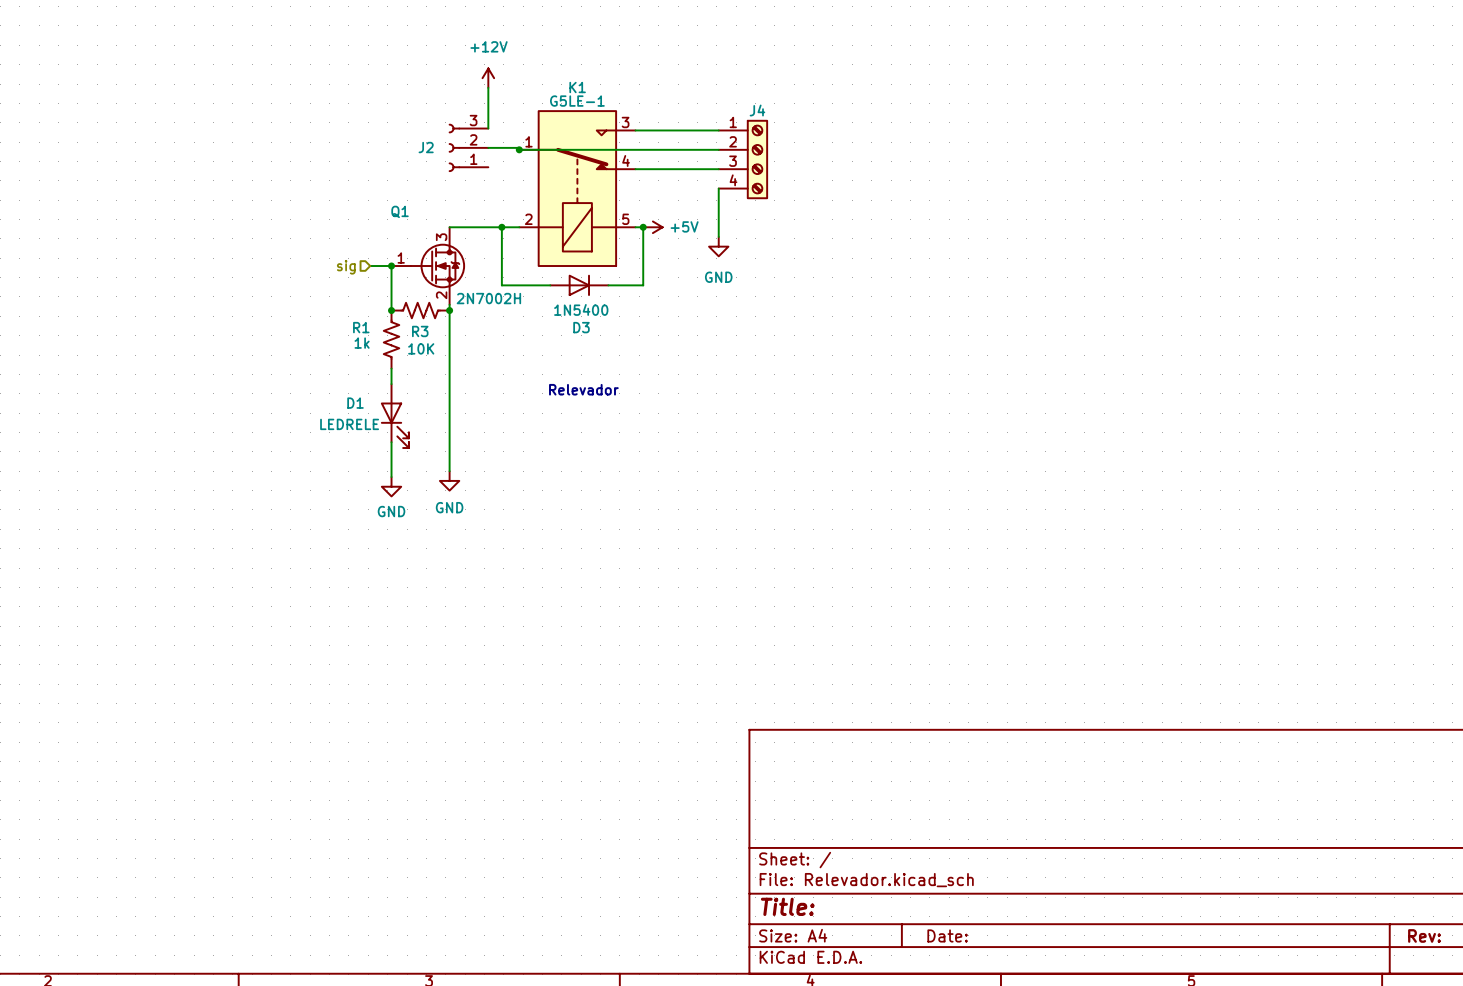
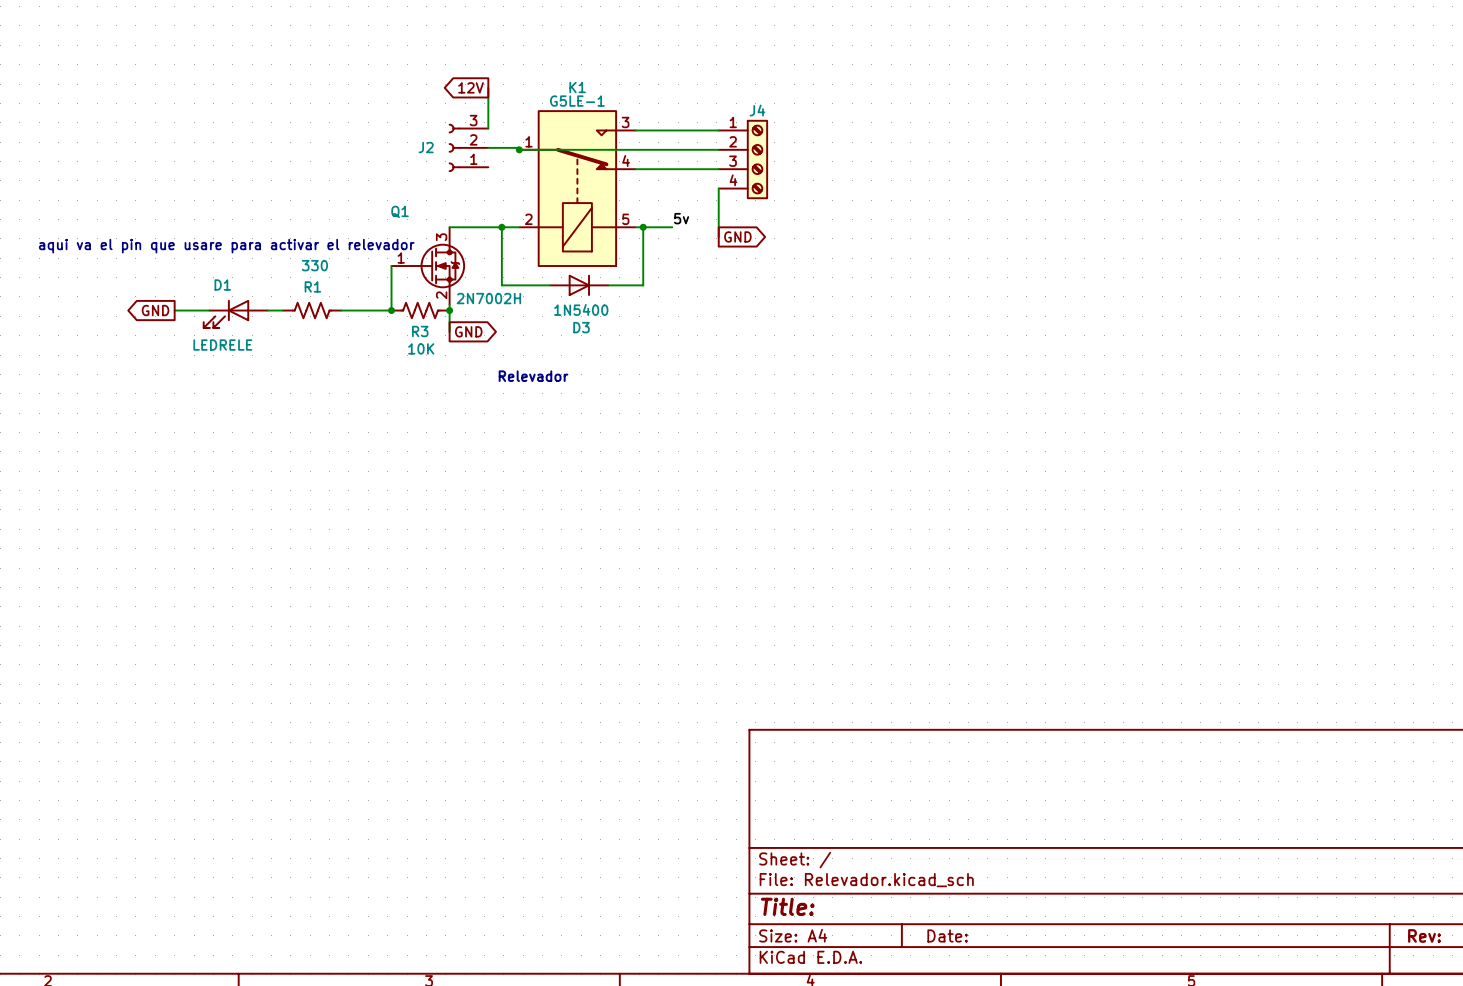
power symbol: +12V (488, 78) -> none
global label: none -> 12V (471, 87)
label: none -> 5v (681, 218)
power symbol: +5V (652, 227) -> none
global label: none -> GND (737, 236)
text: none -> aqui va el pin que usare para activar el relevador (226, 246)
power symbol: GND (718, 246) -> none
wire: (370, 266) (391, 266) -> none
junction: (391, 266) -> none
hierarchical label: sig (346, 267) -> none
global label: none -> GND (155, 310)
wire: none -> (174, 310) (209, 310)
wire: none -> (267, 310) (283, 310)
wire: none -> (341, 310) (391, 310)
wire: (449, 331) (449, 471) -> none
global label: none -> GND (468, 331)
R1 rotation: 0° (391, 339) -> 90° clockwise (312, 310)
R1 position: (391, 339) -> (312, 310)
R1 value: 1k (362, 343) -> 330 (314, 265)
wire: (391, 368) (391, 384) -> none
text position: Relevador (583, 389) -> Relevador (533, 376)
D1 name position: D1 (355, 403) -> D1 (222, 285)
D1 position: (394, 416) -> (235, 313)
D1 value position: LEDRELE (349, 424) -> LEDRELE (222, 345)
D1 rotation: 0° (394, 425) -> 90° clockwise (226, 313)
wire: (391, 442) (391, 477) -> none
power symbol: GND (449, 480) -> none
power symbol: GND (391, 486) -> none

